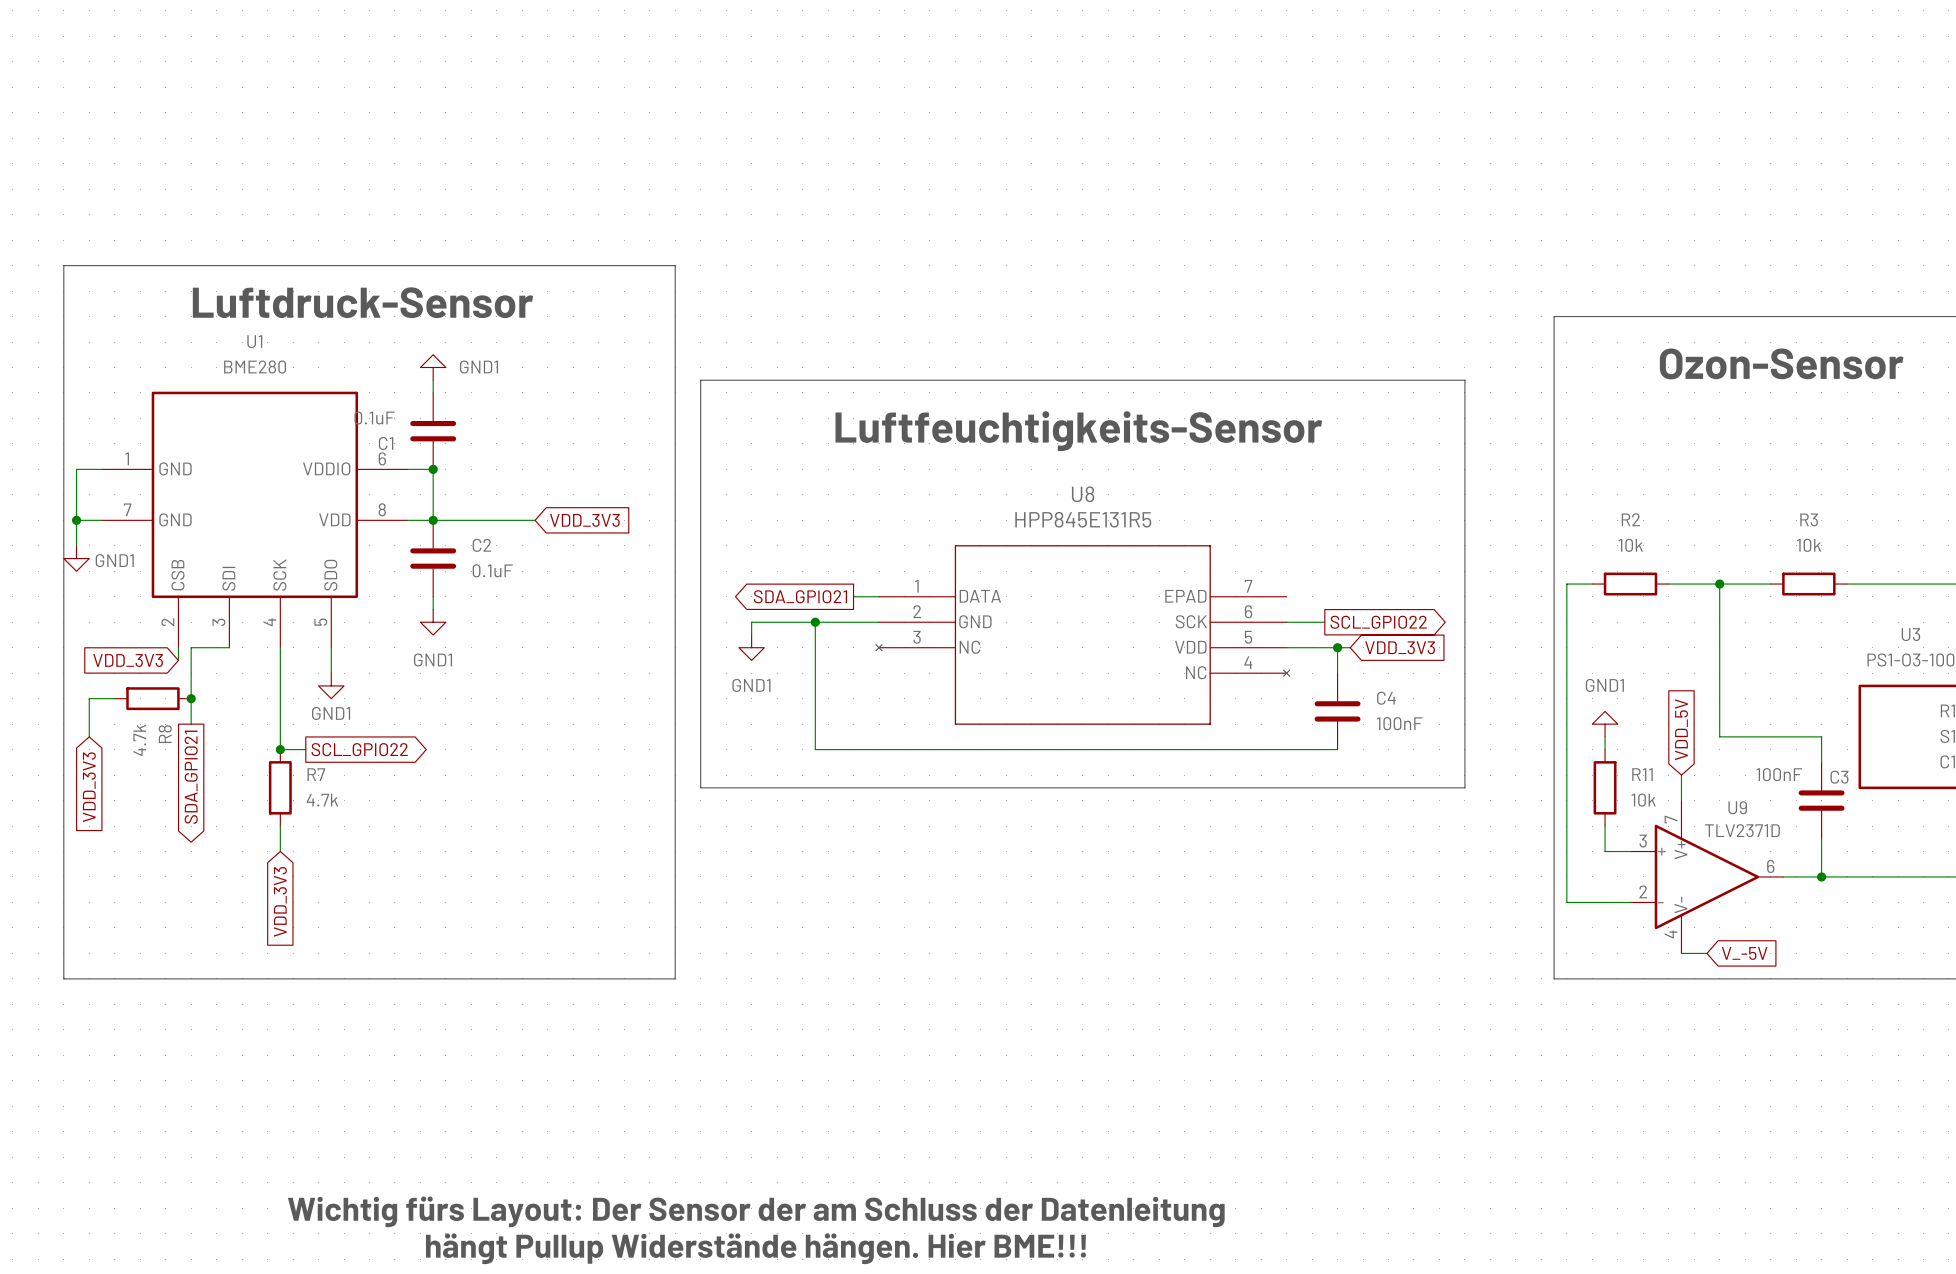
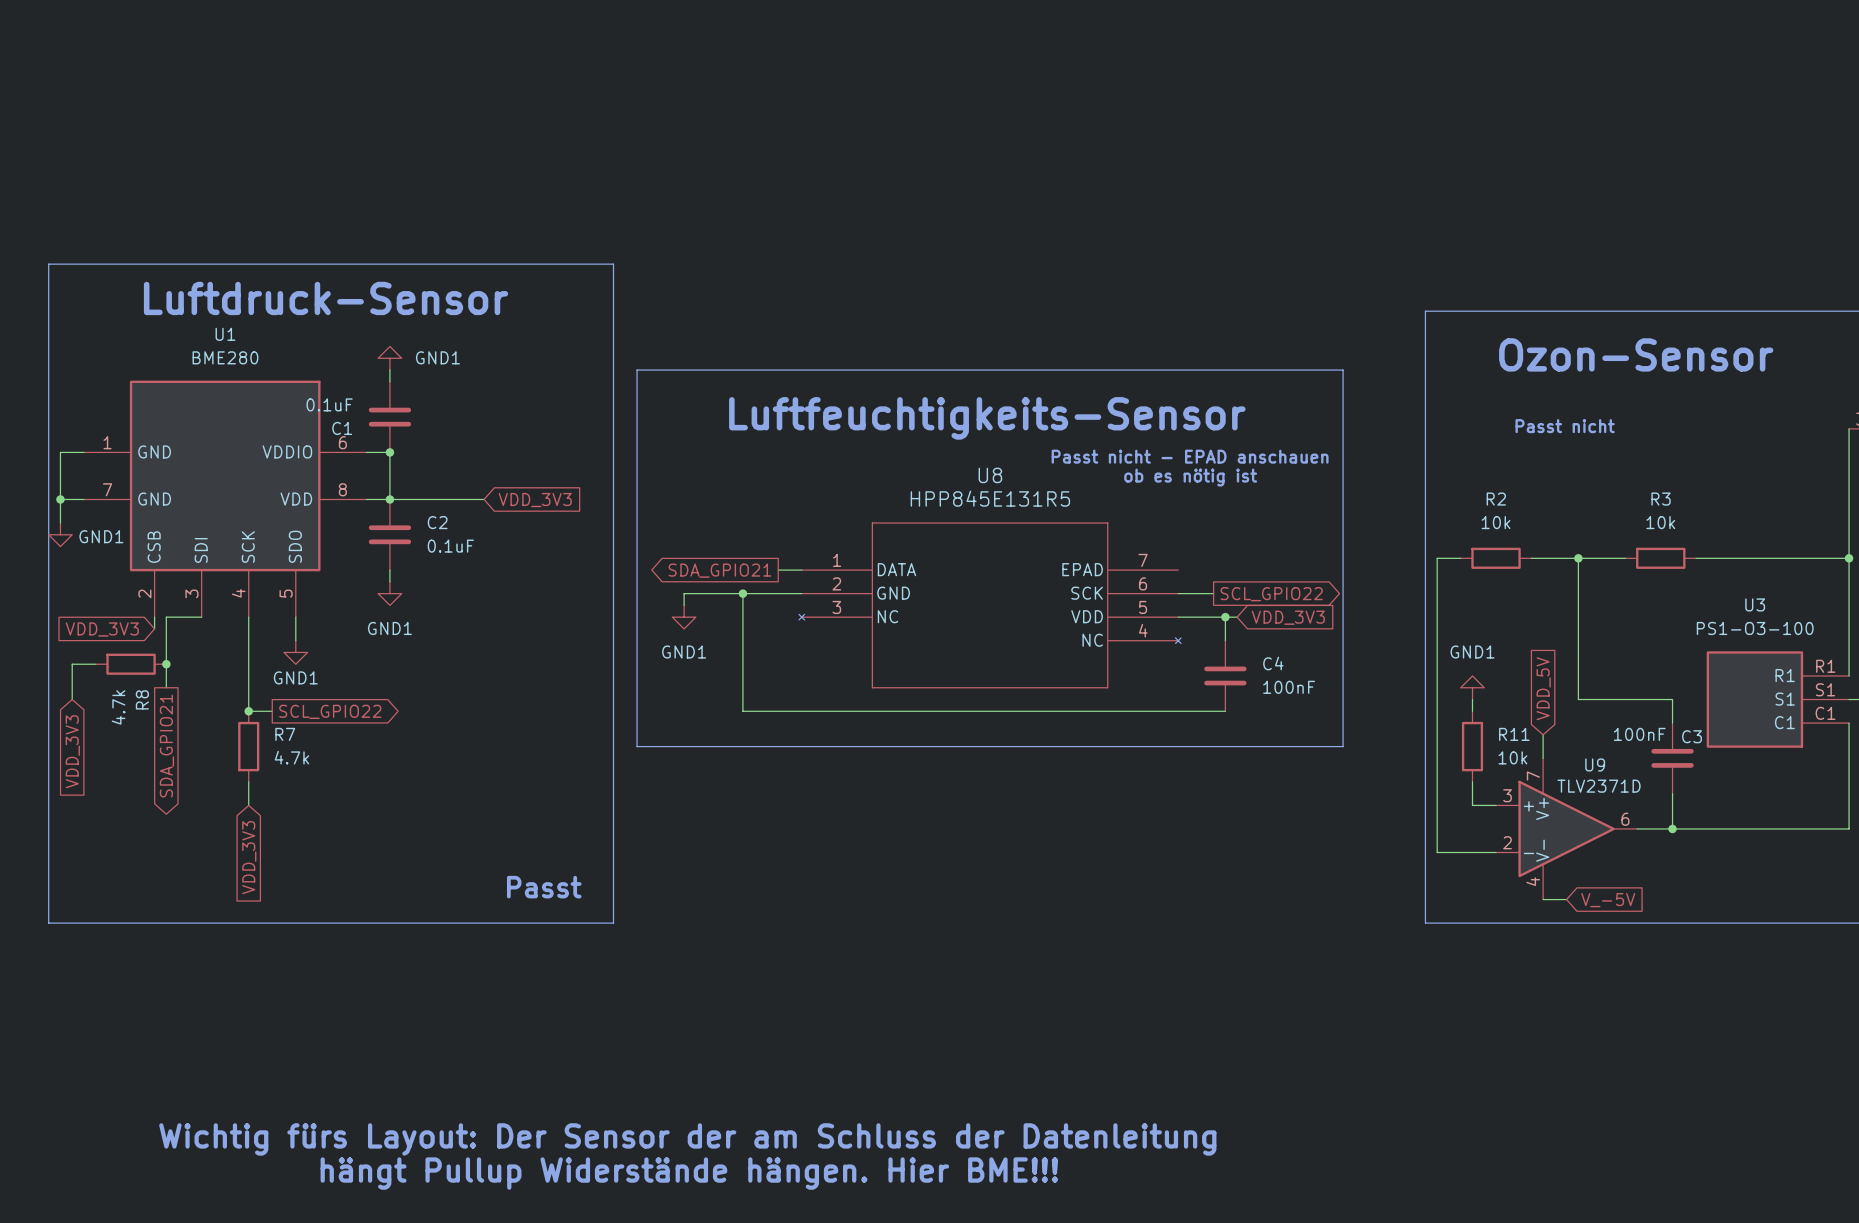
text: none -> Passt nicht (1565, 426)
text: none -> Passt nicht - EPAD anschauen (1190, 456)
text: none -> ob es nötig ist (1190, 477)
text: none -> Passt (544, 887)

